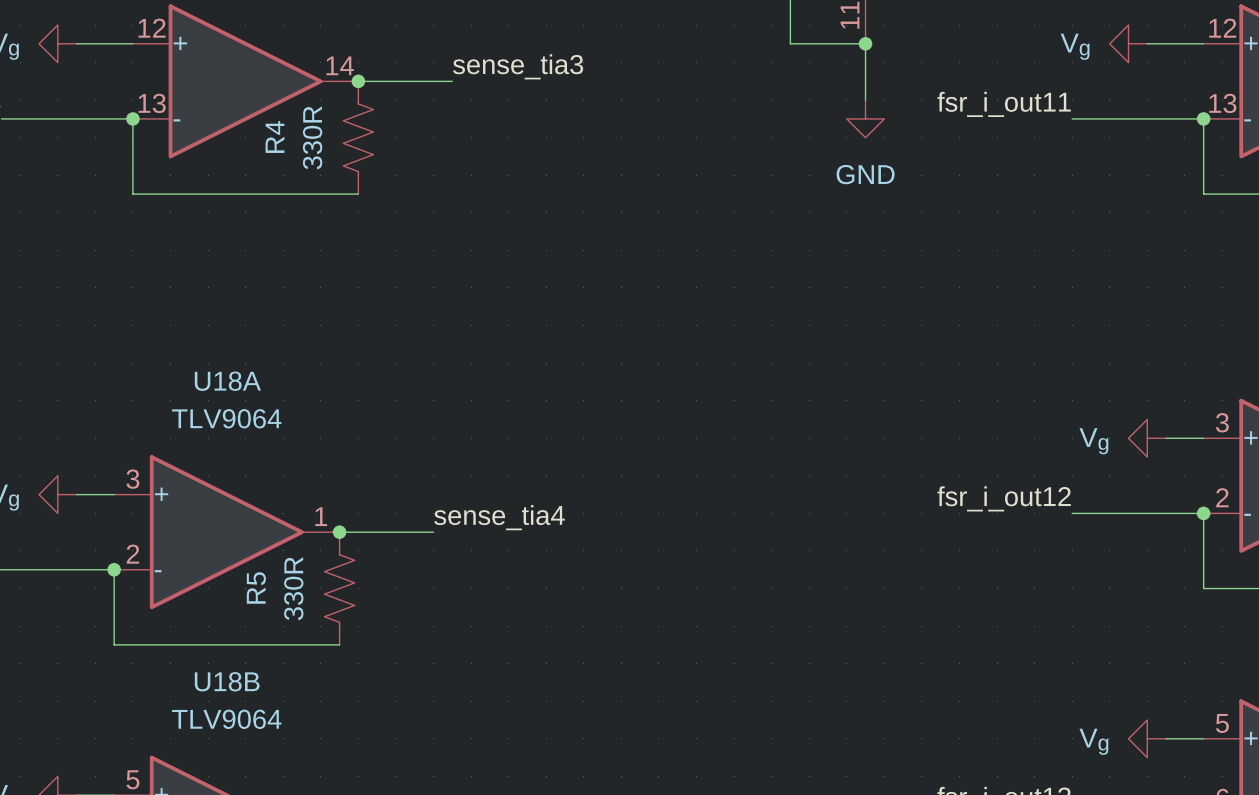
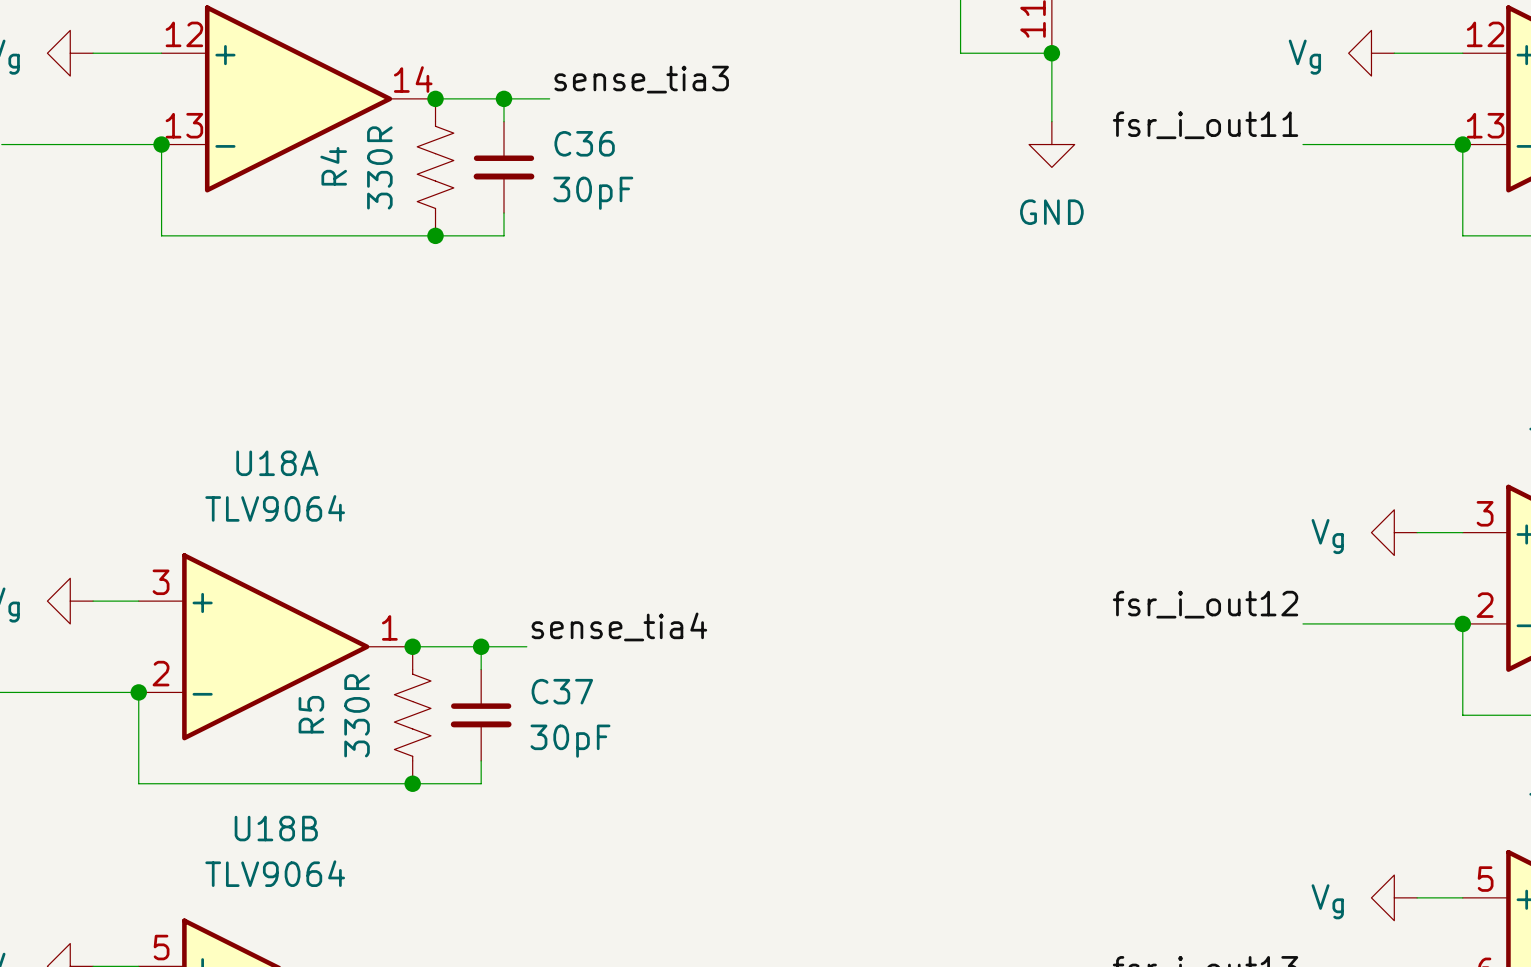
wire: none -> (504, 98) (504, 121)
junction: none -> (504, 98)
C36: none -> 30pF (504, 167)
wire: none -> (504, 213) (504, 235) (435, 235)
junction: none -> (435, 235)
wire: none -> (481, 646) (481, 669)
junction: none -> (481, 646)
C37: none -> 30pF (481, 715)
wire: none -> (481, 760) (481, 783) (412, 783)
junction: none -> (412, 783)

